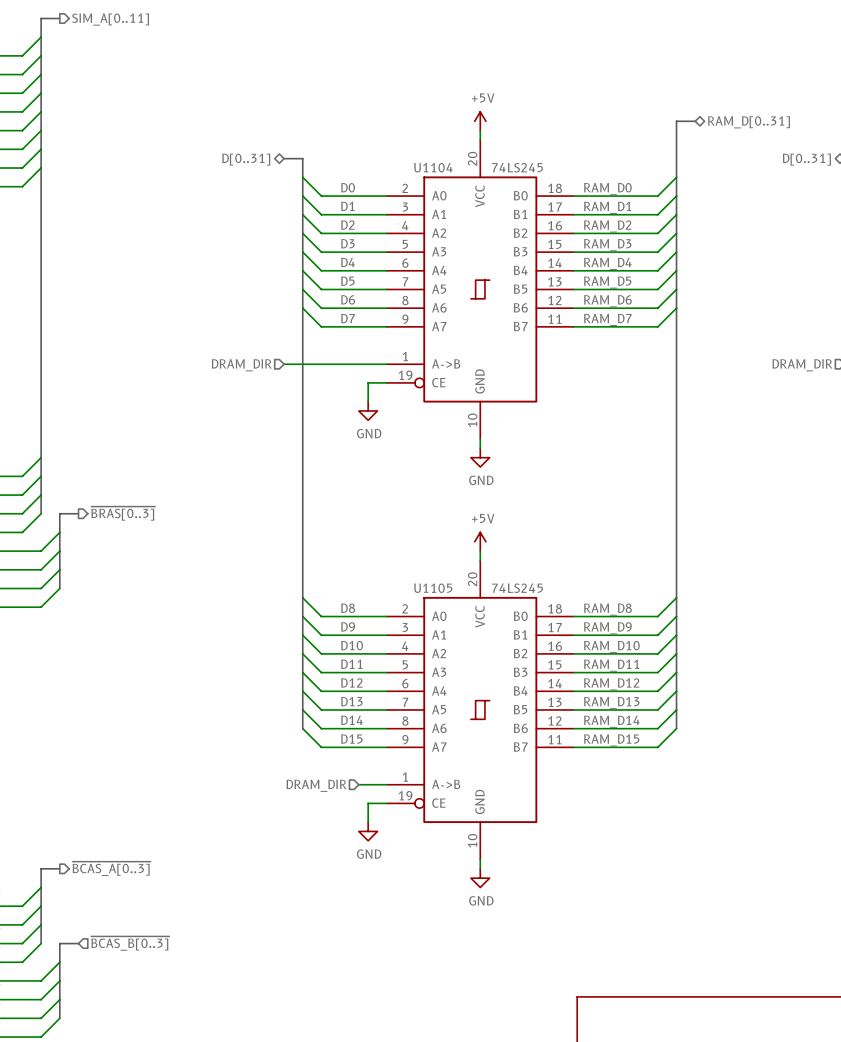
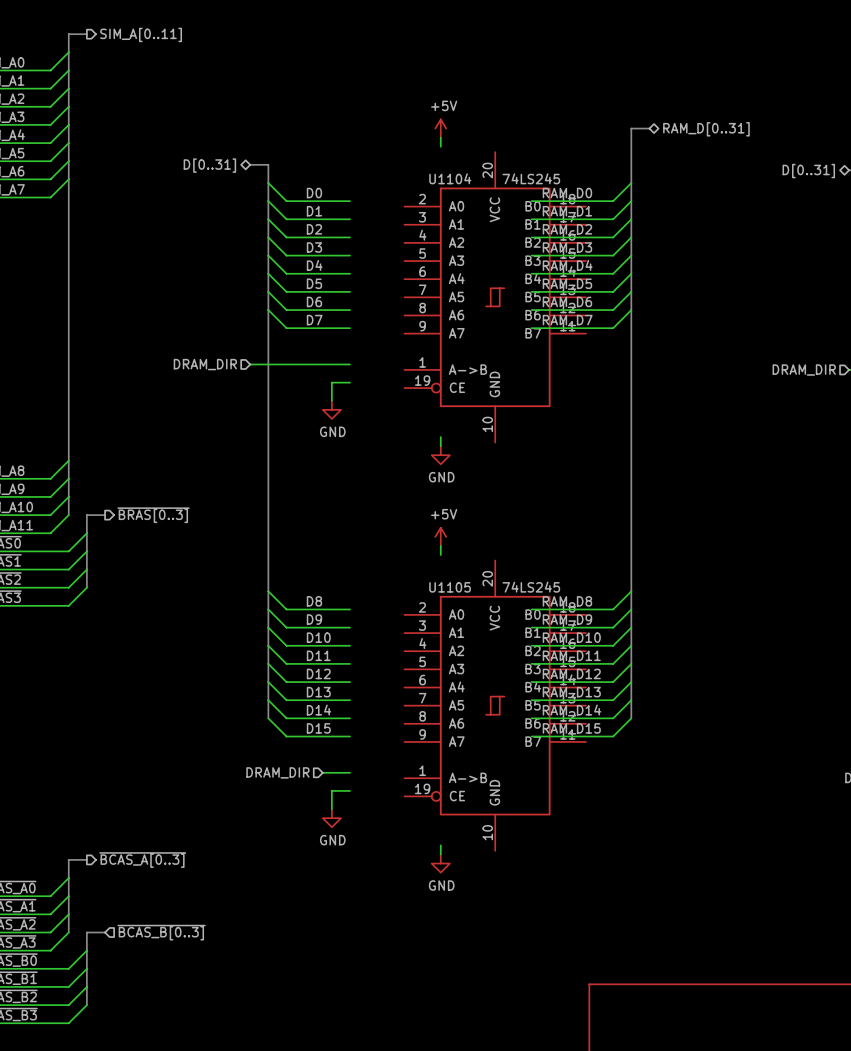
power symbol position: +5V (480, 121) -> +5V (440, 128)
bus: (695, 121) (676, 121) (676, 728) -> (649, 128) (631, 128) (631, 718)
hierarchical label position: RAM_D[0..31] (749, 122) -> RAM_D[0..31] (706, 129)
wire: (480, 130) (480, 139) -> (440, 137) (440, 146)
bus: (284, 158) (302, 158) (302, 728) -> (250, 164) (268, 164) (268, 718)
hierarchical label position: D[0..31] (246, 159) -> D[0..31] (209, 165)
wire: (302, 177) (321, 196) (386, 196) -> (268, 183) (286, 201) (350, 201)
wire: (676, 177) (657, 196) (573, 196) -> (631, 183) (613, 201) (531, 201)
label position: D0 (348, 187) -> D0 (314, 193)
label position: RAM_D0 (607, 189) -> RAM_D0 (567, 193)
wire: (302, 196) (321, 214) (386, 214) -> (268, 201) (286, 219) (350, 219)
wire: (676, 196) (657, 214) (573, 214) -> (631, 201) (613, 219) (531, 219)
label position: D1 (347, 206) -> D1 (314, 211)
label position: RAM_D1 (607, 207) -> RAM_D1 (567, 211)
wire: (302, 214) (321, 233) (386, 233) -> (268, 219) (286, 237) (350, 237)
wire: (676, 214) (657, 233) (573, 233) -> (631, 219) (613, 237) (531, 237)
label position: D2 (347, 225) -> D2 (314, 229)
label position: RAM_D2 (607, 226) -> RAM_D2 (567, 229)
wire: (302, 233) (321, 252) (386, 252) -> (268, 237) (286, 255) (350, 255)
wire: (676, 233) (657, 252) (573, 252) -> (631, 237) (613, 255) (531, 255)
label position: D3 (347, 243) -> D3 (314, 247)
label position: RAM_D3 (607, 245) -> RAM_D3 (567, 247)
wire: (302, 252) (321, 270) (386, 270) -> (268, 255) (286, 273) (350, 273)
wire: (676, 252) (657, 270) (573, 270) -> (631, 255) (613, 273) (531, 273)
label position: D4 (348, 262) -> D4 (314, 265)
label position: RAM_D4 (607, 263) -> RAM_D4 (567, 265)
wire: (302, 270) (321, 289) (386, 289) -> (268, 273) (286, 291) (350, 291)
wire: (676, 270) (657, 289) (573, 289) -> (631, 273) (613, 291) (531, 291)
label position: D5 (347, 281) -> D5 (314, 283)
label position: RAM_D5 (607, 282) -> RAM_D5 (567, 284)
wire: (302, 289) (321, 308) (386, 308) -> (268, 291) (286, 310) (350, 310)
wire: (676, 289) (657, 308) (573, 308) -> (631, 291) (613, 310) (531, 310)
label position: D6 (348, 299) -> D6 (314, 301)
label position: RAM_D6 (607, 301) -> RAM_D6 (567, 302)
wire: (302, 308) (321, 326) (386, 326) -> (268, 310) (286, 328) (350, 328)
wire: (676, 308) (657, 326) (573, 326) -> (631, 310) (613, 328) (531, 328)
label position: D7 (348, 318) -> D7 (314, 320)
label position: RAM_D7 (607, 319) -> RAM_D7 (567, 320)
wire: (284, 364) (386, 364) -> (250, 364) (350, 364)
hierarchical label position: DRAM_DIR (241, 365) -> DRAM_DIR (205, 364)
wire: (386, 382) (368, 382) (368, 401) -> (350, 382) (331, 382) (331, 400)
power symbol: none -> GND (331, 409)
power symbol: GND (368, 410) -> none
wire: (480, 438) (480, 448) -> (440, 437) (440, 446)
power symbol: none -> GND (440, 455)
power symbol: GND (480, 457) -> none
power symbol position: +5V (480, 541) -> +5V (440, 536)
wire: (480, 551) (480, 560) -> (440, 545) (440, 555)
wire: (302, 597) (321, 616) (386, 616) -> (268, 591) (286, 609) (350, 609)
wire: (676, 597) (657, 616) (573, 616) -> (631, 591) (613, 609) (531, 609)
label position: D8 (348, 608) -> D8 (314, 601)
label position: RAM_D8 (607, 609) -> RAM_D8 (567, 601)
wire: (302, 616) (321, 635) (386, 635) -> (268, 609) (286, 627) (350, 627)
wire: (676, 616) (657, 635) (573, 635) -> (631, 609) (613, 627) (531, 627)
label position: D9 (348, 626) -> D9 (314, 619)
label position: RAM_D9 (607, 628) -> RAM_D9 (567, 619)
wire: (302, 635) (321, 653) (386, 653) -> (268, 627) (286, 645) (350, 645)
wire: (676, 635) (657, 653) (573, 653) -> (631, 627) (613, 645) (531, 645)
label position: D10 (352, 645) -> D10 (318, 637)
label position: RAM_D10 (611, 646) -> RAM_D10 (571, 638)
wire: (302, 653) (321, 672) (386, 672) -> (268, 645) (286, 663) (350, 663)
wire: (676, 653) (657, 672) (573, 672) -> (631, 645) (613, 663) (531, 663)
label position: D11 (351, 664) -> D11 (318, 655)
label position: RAM_D11 (611, 665) -> RAM_D11 (571, 656)
wire: (302, 672) (321, 691) (386, 691) -> (268, 663) (286, 682) (350, 682)
wire: (676, 672) (657, 691) (573, 691) -> (631, 663) (613, 682) (531, 682)
label position: D12 (351, 682) -> D12 (318, 673)
label position: RAM_D12 (611, 684) -> RAM_D12 (571, 674)
wire: (302, 691) (321, 709) (386, 709) -> (268, 682) (286, 700) (350, 700)
wire: (676, 691) (657, 709) (573, 709) -> (631, 682) (613, 700) (531, 700)
label position: D13 (351, 701) -> D13 (318, 692)
label position: RAM_D13 (611, 703) -> RAM_D13 (571, 692)
wire: (302, 709) (321, 728) (386, 728) -> (268, 700) (286, 718) (350, 718)
wire: (676, 709) (657, 728) (573, 728) -> (631, 700) (613, 718) (531, 718)
label position: D14 (352, 720) -> D14 (318, 710)
label position: RAM_D14 (611, 721) -> RAM_D14 (571, 710)
wire: (302, 728) (321, 747) (386, 747) -> (268, 718) (286, 736) (350, 736)
wire: (676, 728) (657, 747) (573, 747) -> (631, 718) (613, 736) (531, 736)
label position: D15 (351, 739) -> D15 (318, 728)
label position: RAM_D15 (611, 740) -> RAM_D15 (571, 728)
wire: (358, 784) (386, 784) -> (322, 772) (350, 772)
hierarchical label position: DRAM_DIR (316, 785) -> DRAM_DIR (277, 772)
wire: (386, 803) (368, 803) (368, 822) -> (350, 790) (331, 790) (331, 809)
power symbol: none -> GND (331, 818)
power symbol: GND (368, 831) -> none
wire: (480, 859) (480, 868) -> (440, 845) (440, 854)
power symbol: none -> GND (440, 863)
power symbol: GND (480, 878) -> none

